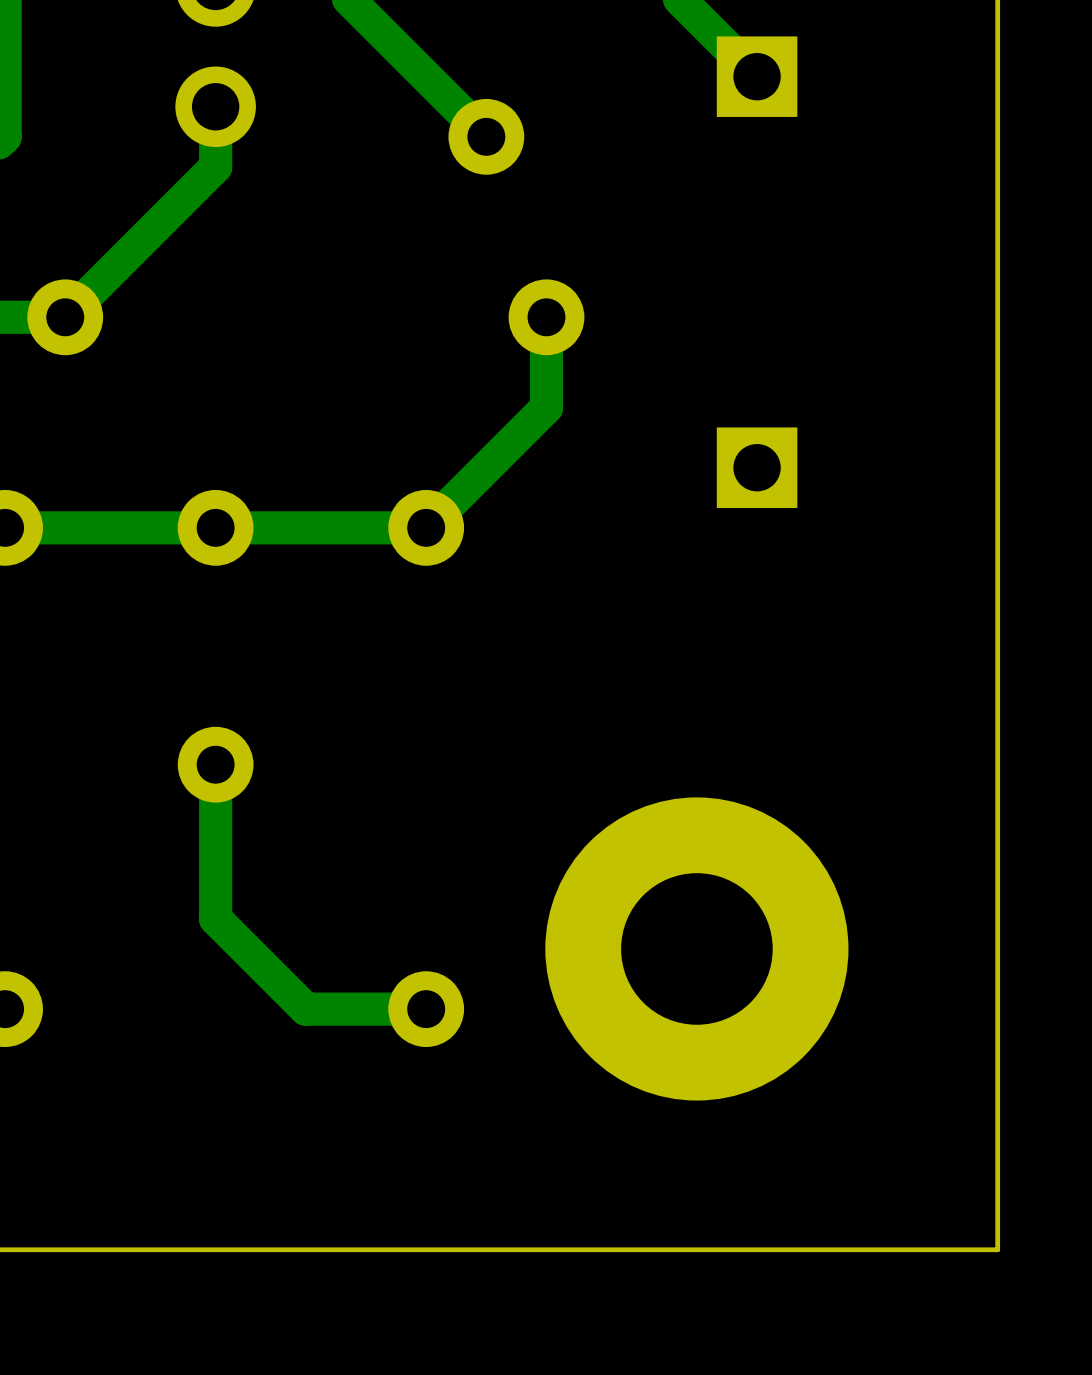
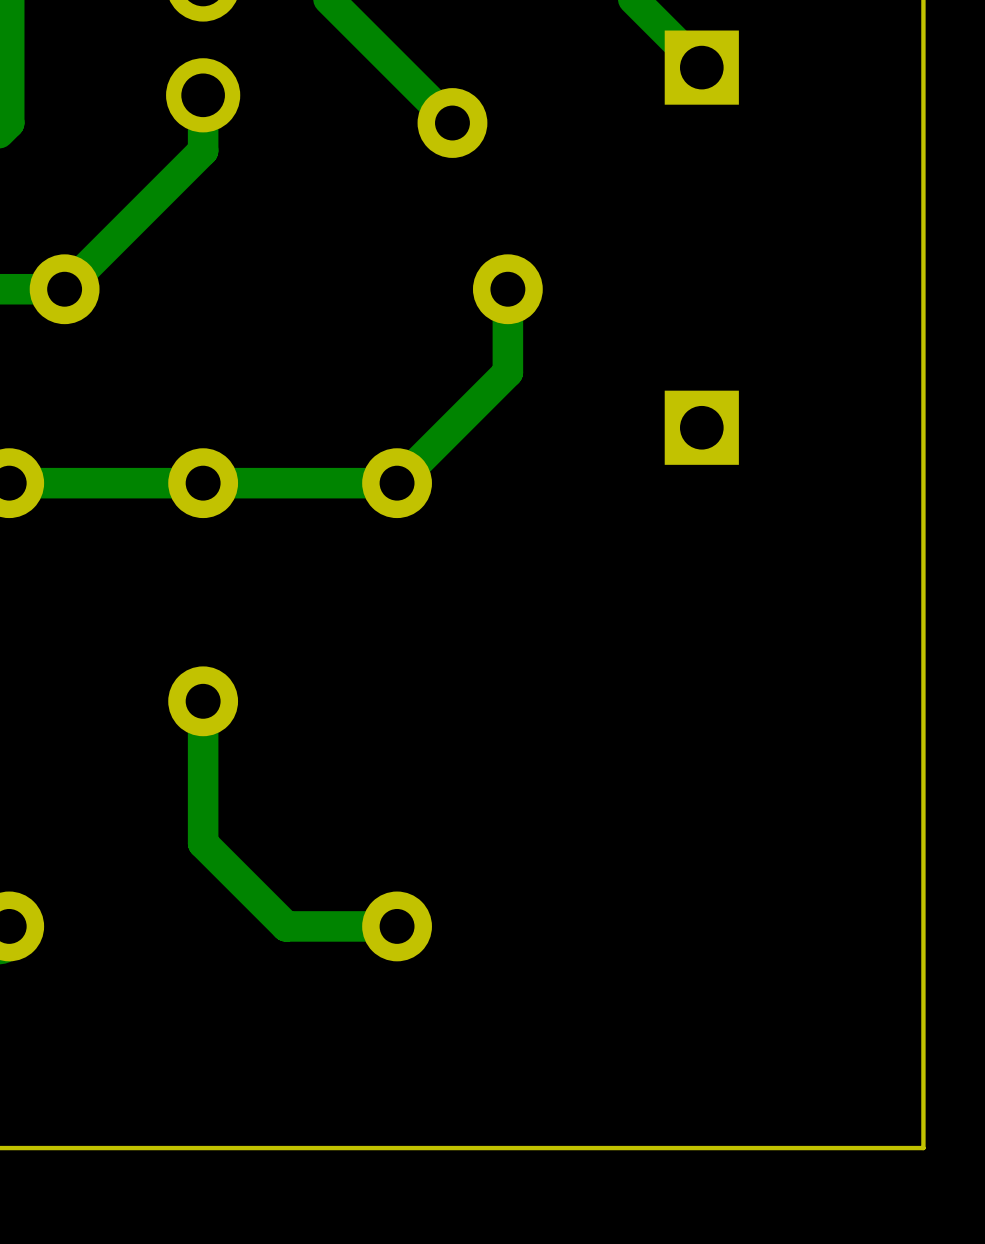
part: (696, 948) -> none

